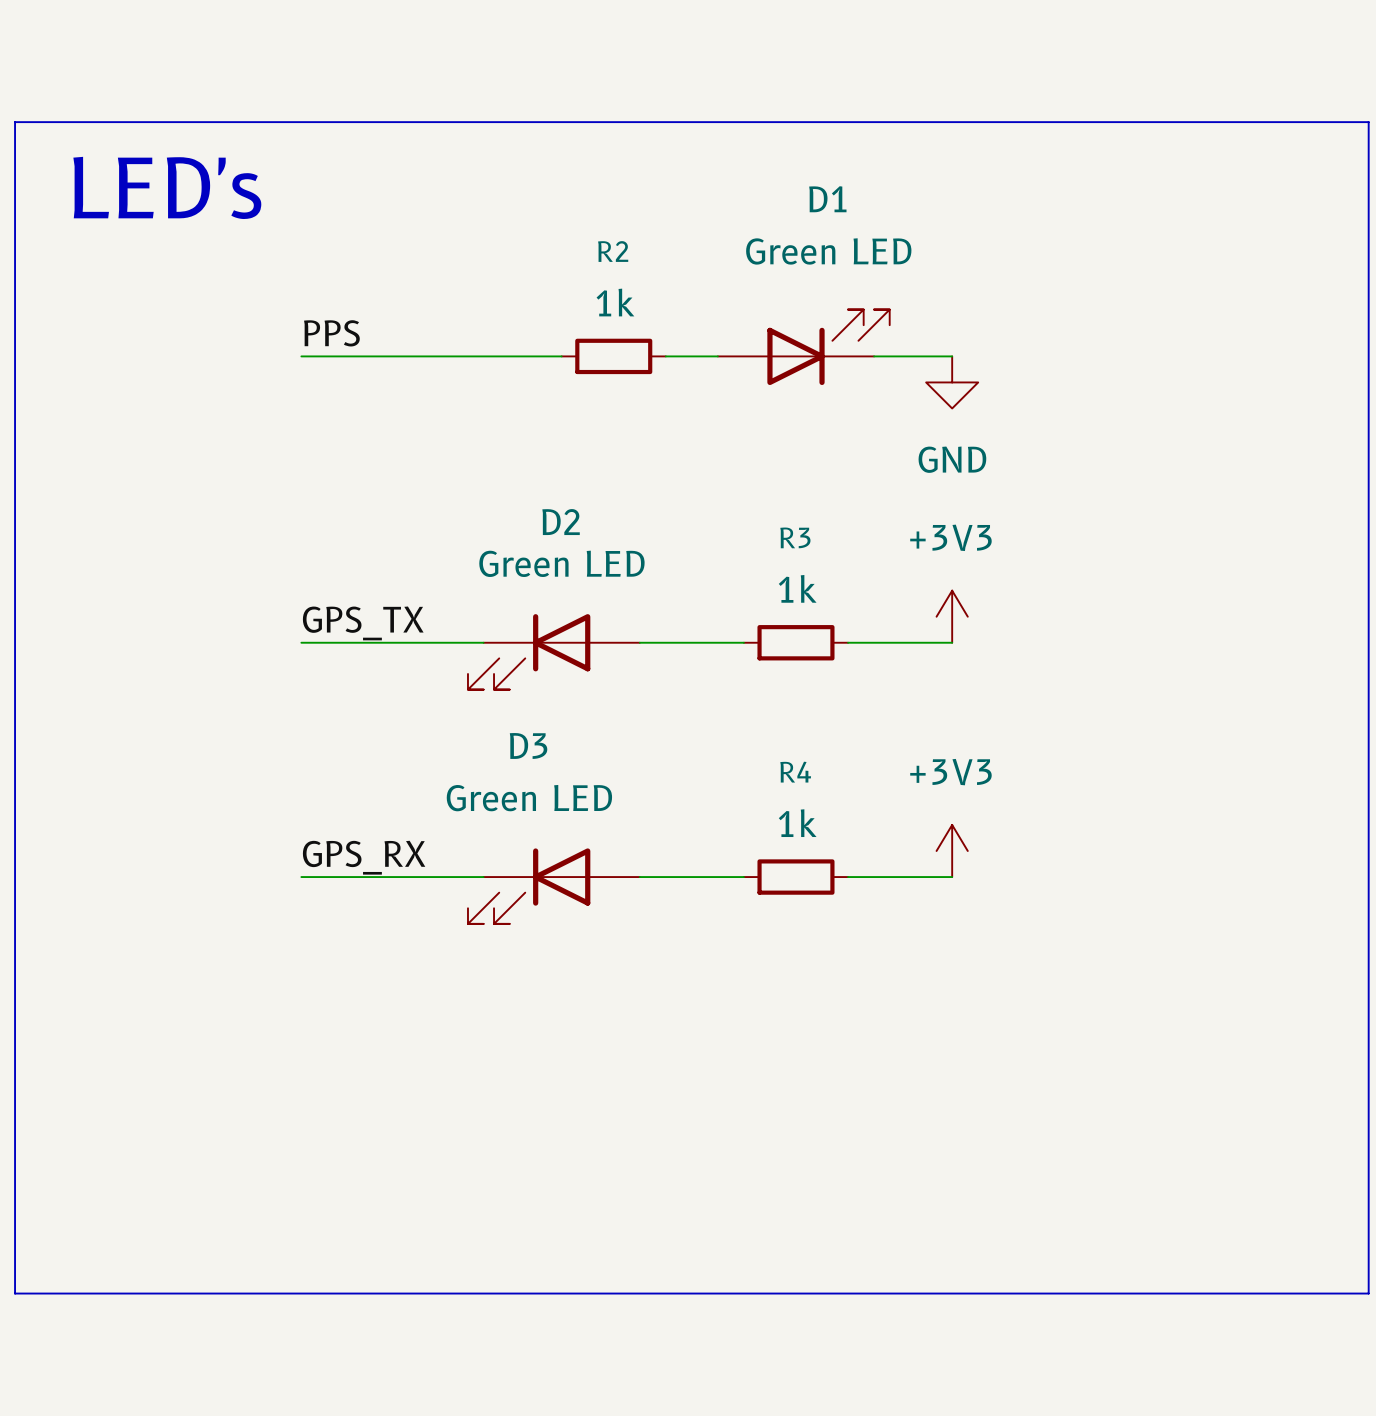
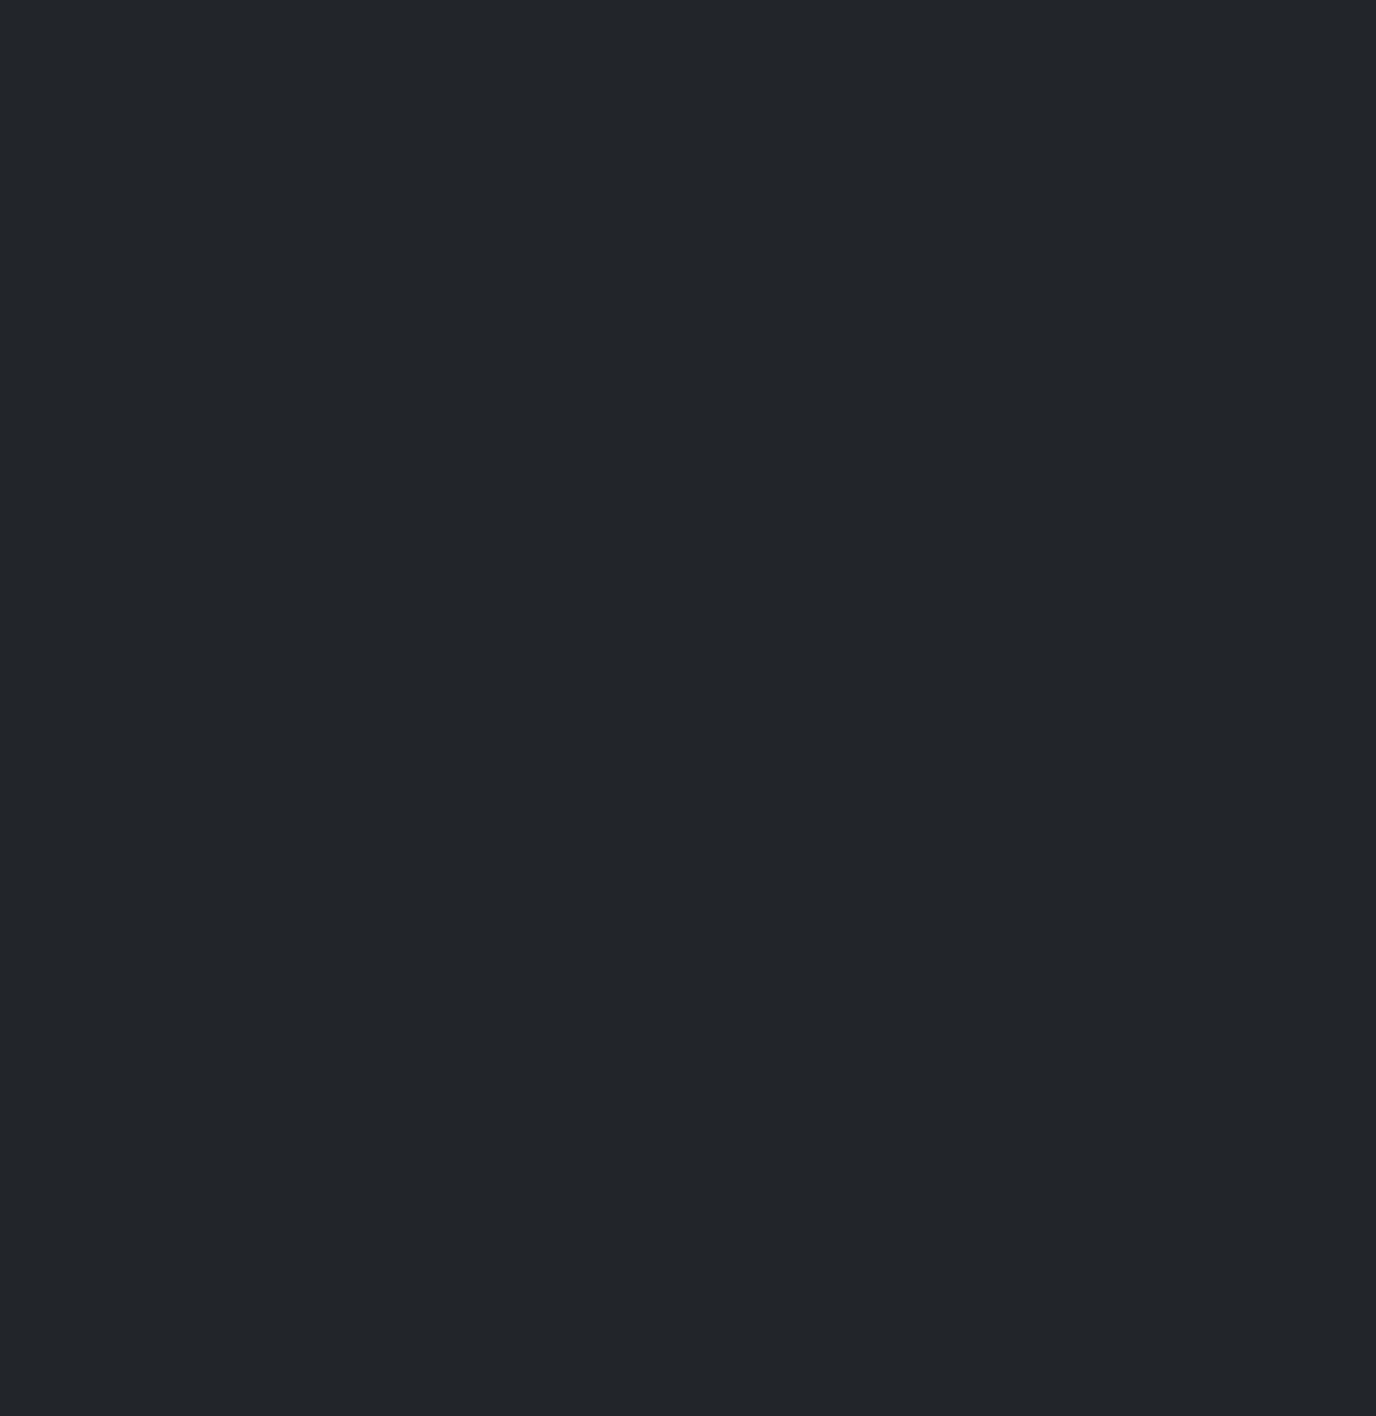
line: (15, 122) (1368, 122) (1368, 1293) (15, 1293) (15, 122) -> none
text: LED's (167, 187) -> none
label: PPS (331, 333) -> none
D1: Green LED (803, 347) -> none
wire: (301, 356) (561, 356) -> none
R2: 1k (613, 356) -> none
wire: (665, 356) (717, 356) -> none
wire: (874, 356) (952, 356) -> none
power symbol: GND (952, 382) -> none
power symbol: +3V3 (952, 616) -> none
label: GPS_TX (363, 623) -> none
wire: (301, 642) (483, 642) -> none
wire: (639, 642) (743, 642) -> none
R3: 1k (795, 642) -> none
wire: (848, 642) (952, 642) -> none
D2: Green LED (553, 651) -> none
power symbol: +3V3 (952, 851) -> none
label: GPS_RX (364, 857) -> none
wire: (301, 877) (483, 877) -> none
wire: (639, 877) (743, 877) -> none
R4: 1k (795, 877) -> none
wire: (848, 877) (952, 877) -> none
D3: Green LED (553, 886) -> none

